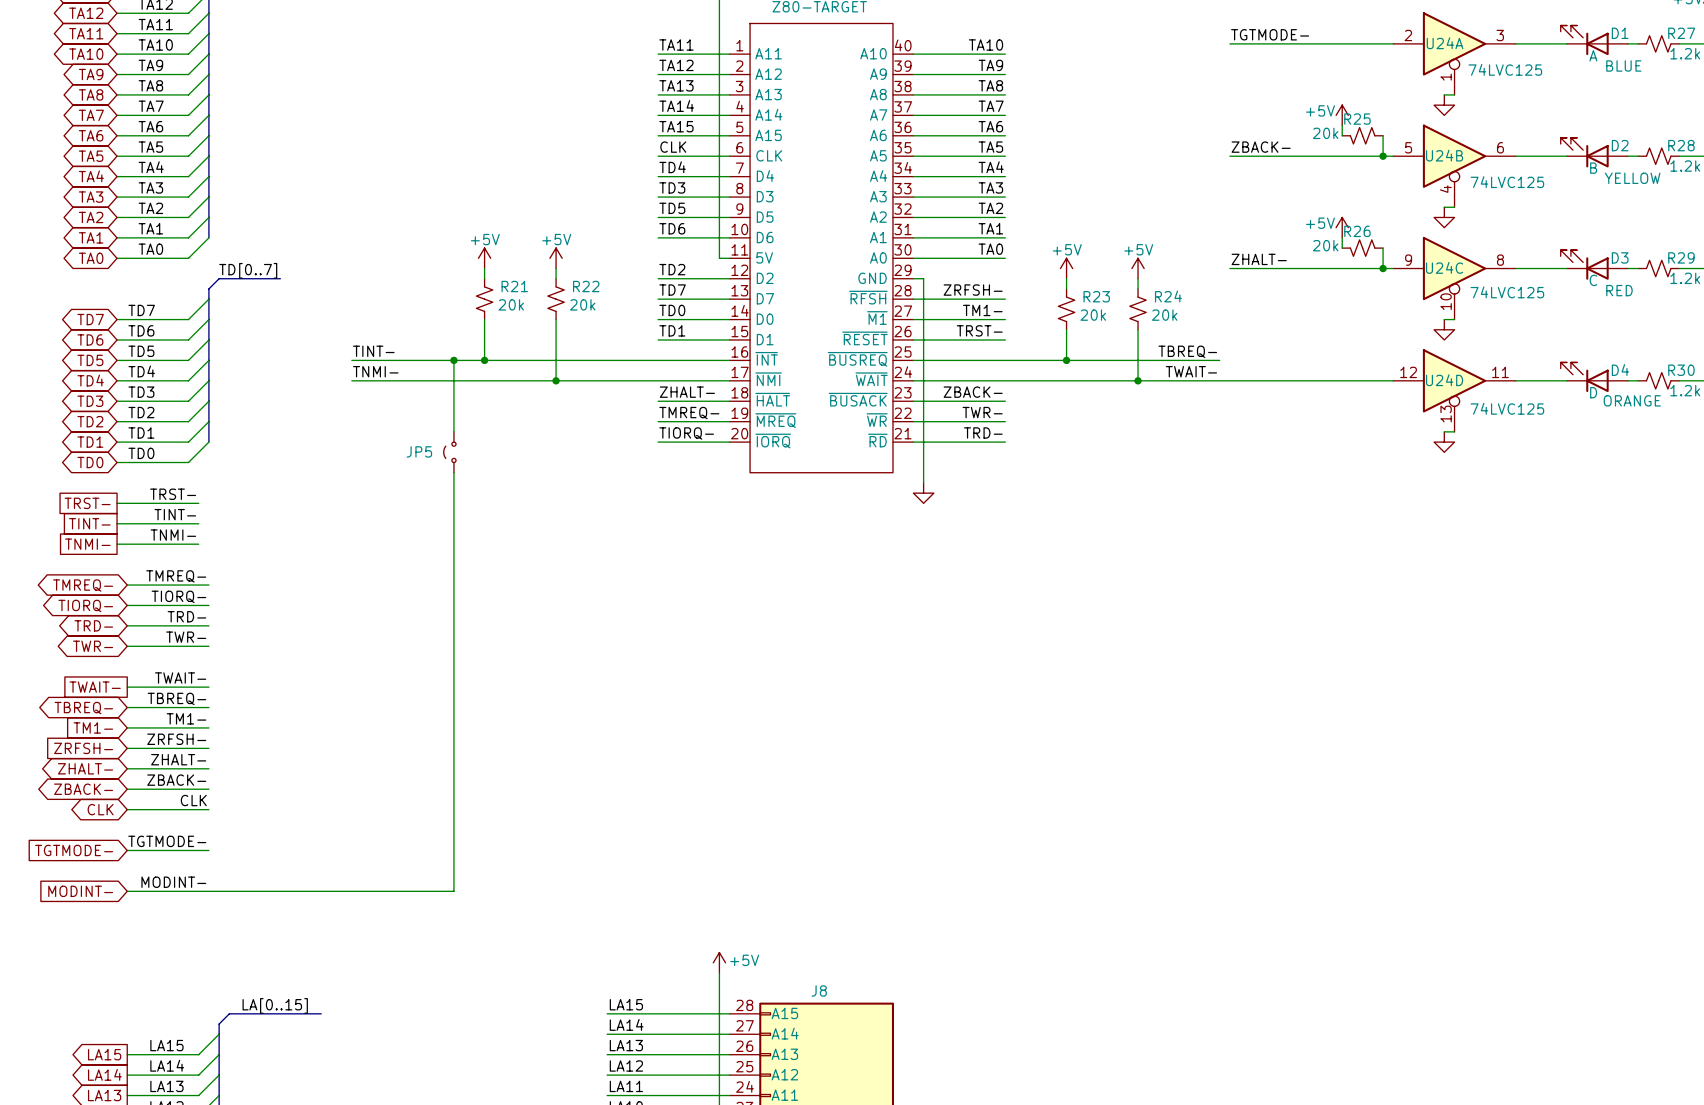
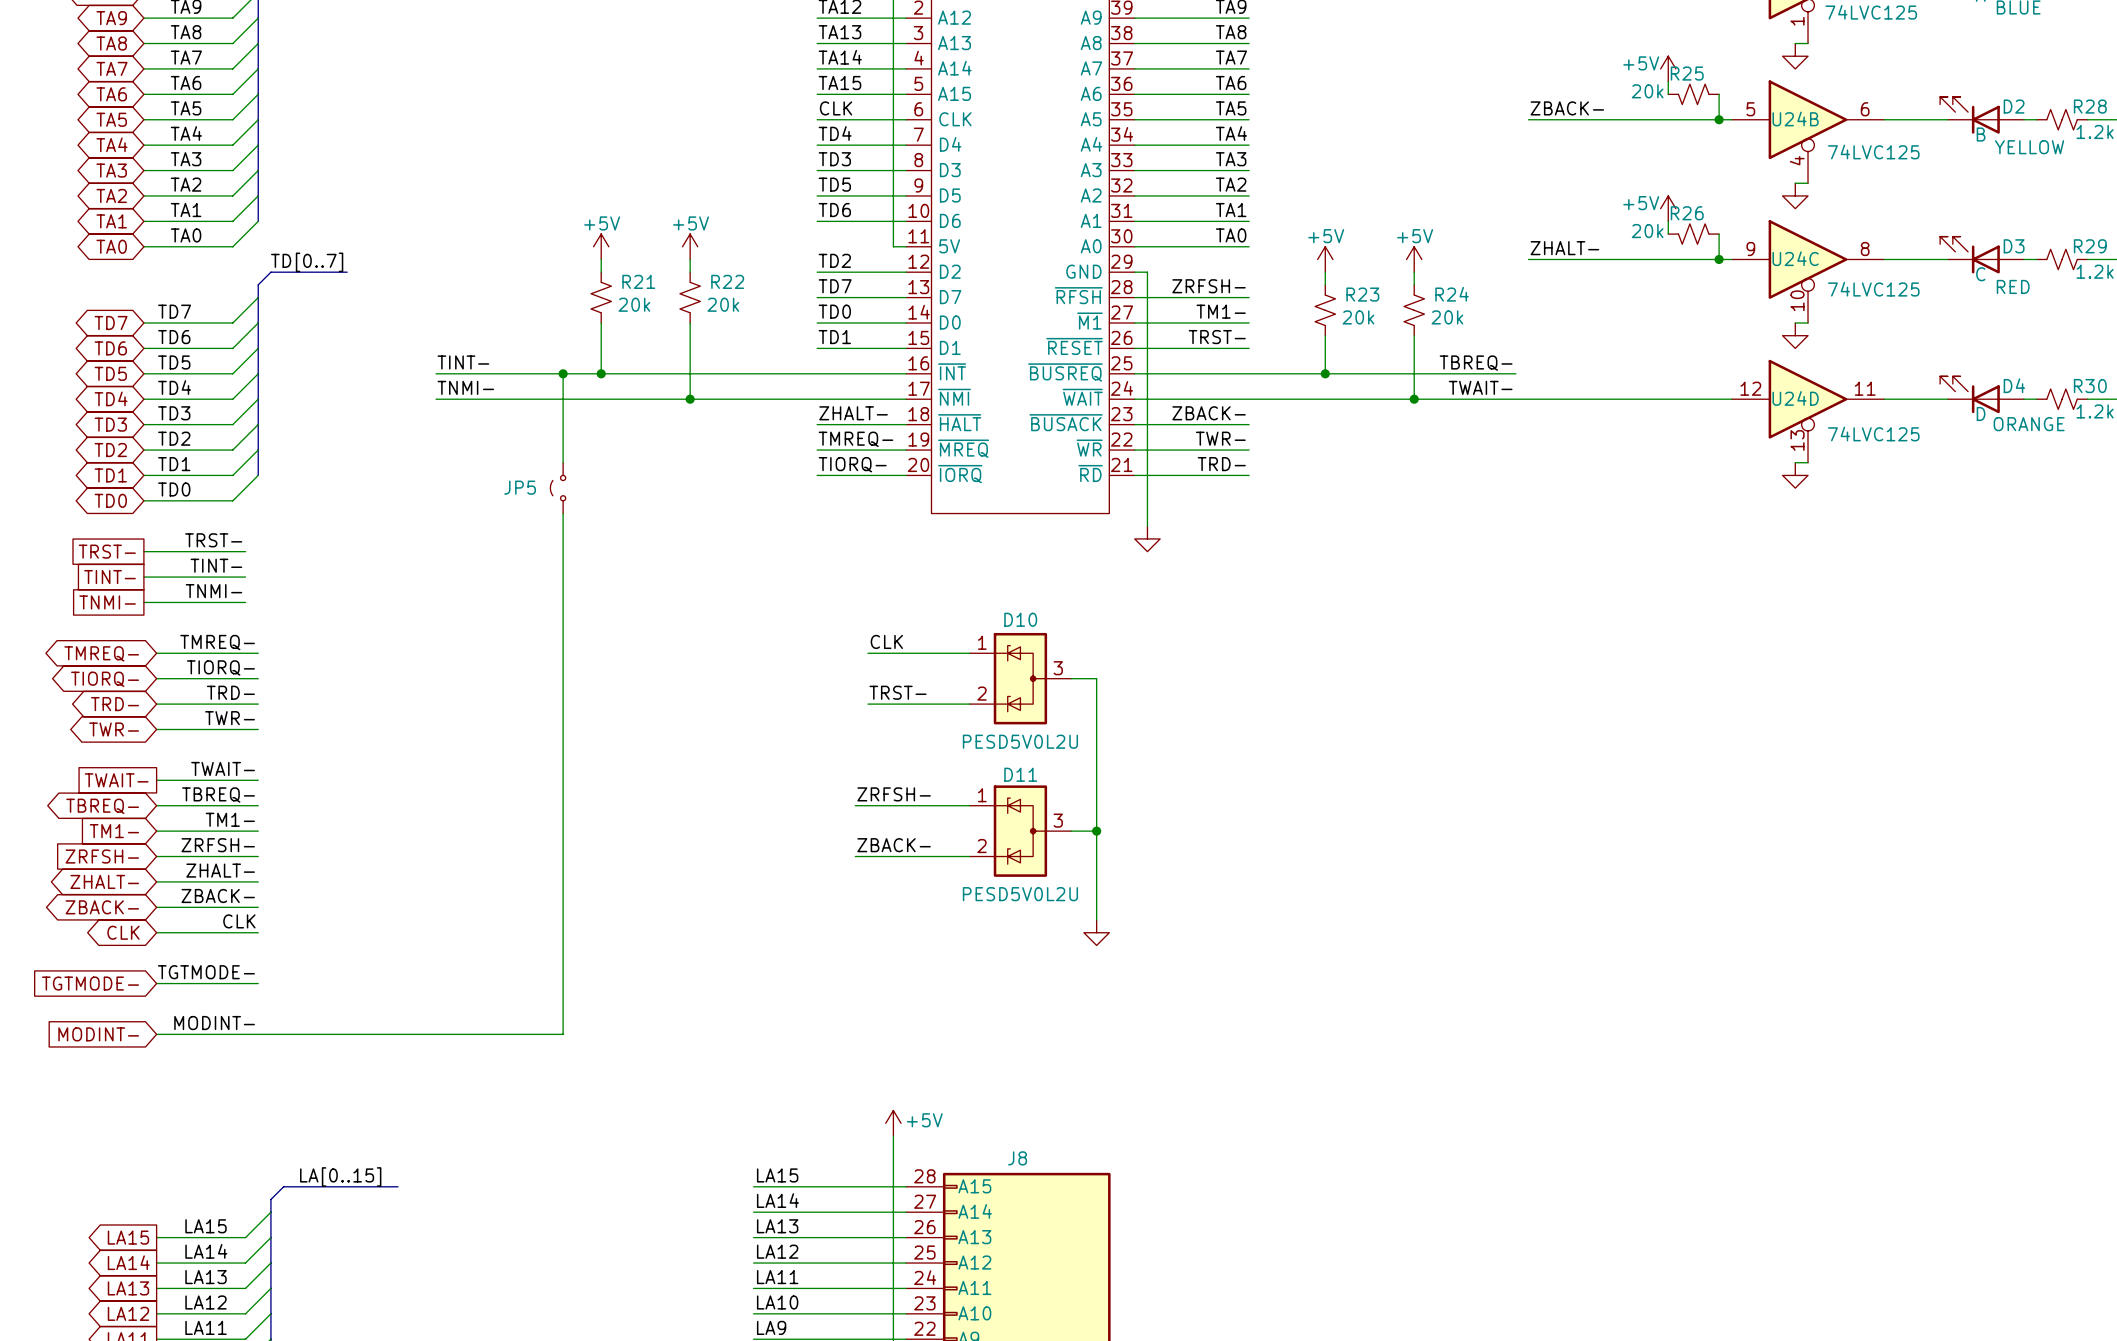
label: none -> CLK (886, 641)
wire: none -> (867, 653) (969, 653)
D10: none -> PESD5V0L2U (1020, 678)
wire: none -> (1071, 678) (1096, 678) (1096, 920)
label: none -> TRST- (898, 692)
wire: none -> (867, 704) (969, 704)
label: none -> ZRFSH- (894, 794)
wire: none -> (855, 805) (969, 805)
D11: none -> PESD5V0L2U (1020, 831)
wire: none -> (1071, 831) (1096, 831)
junction: none -> (1096, 831)
label: none -> ZBACK- (894, 845)
wire: none -> (855, 856) (969, 856)
power symbol: none -> (1096, 932)

